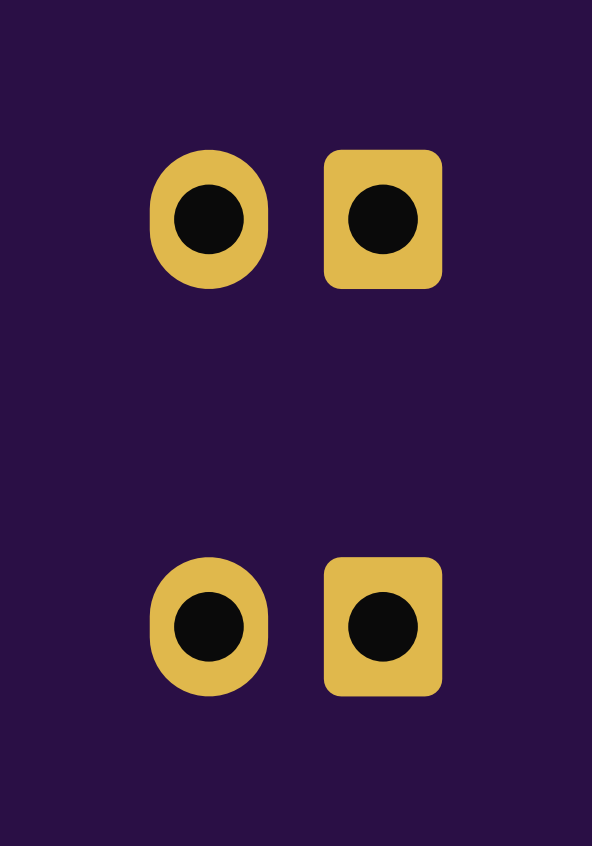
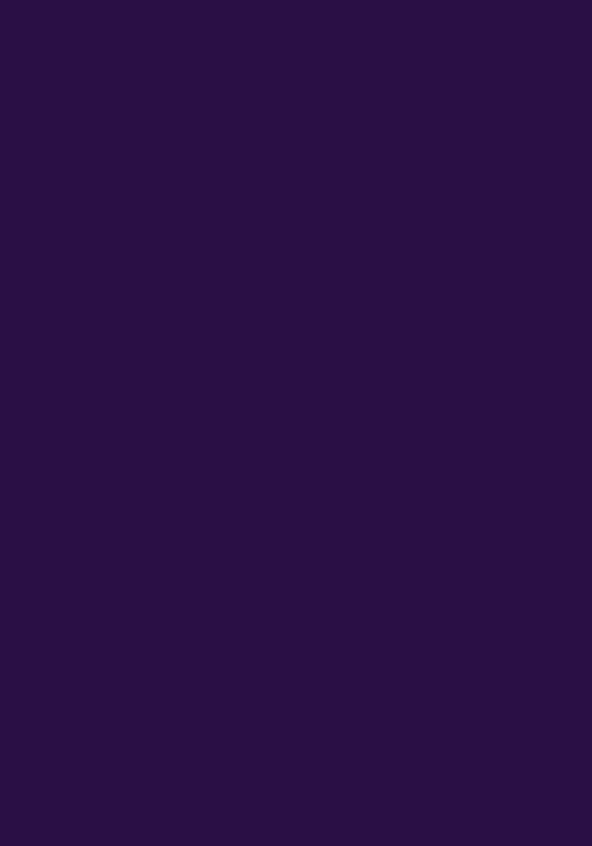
part: (295, 219) -> none
part: (295, 626) -> none

